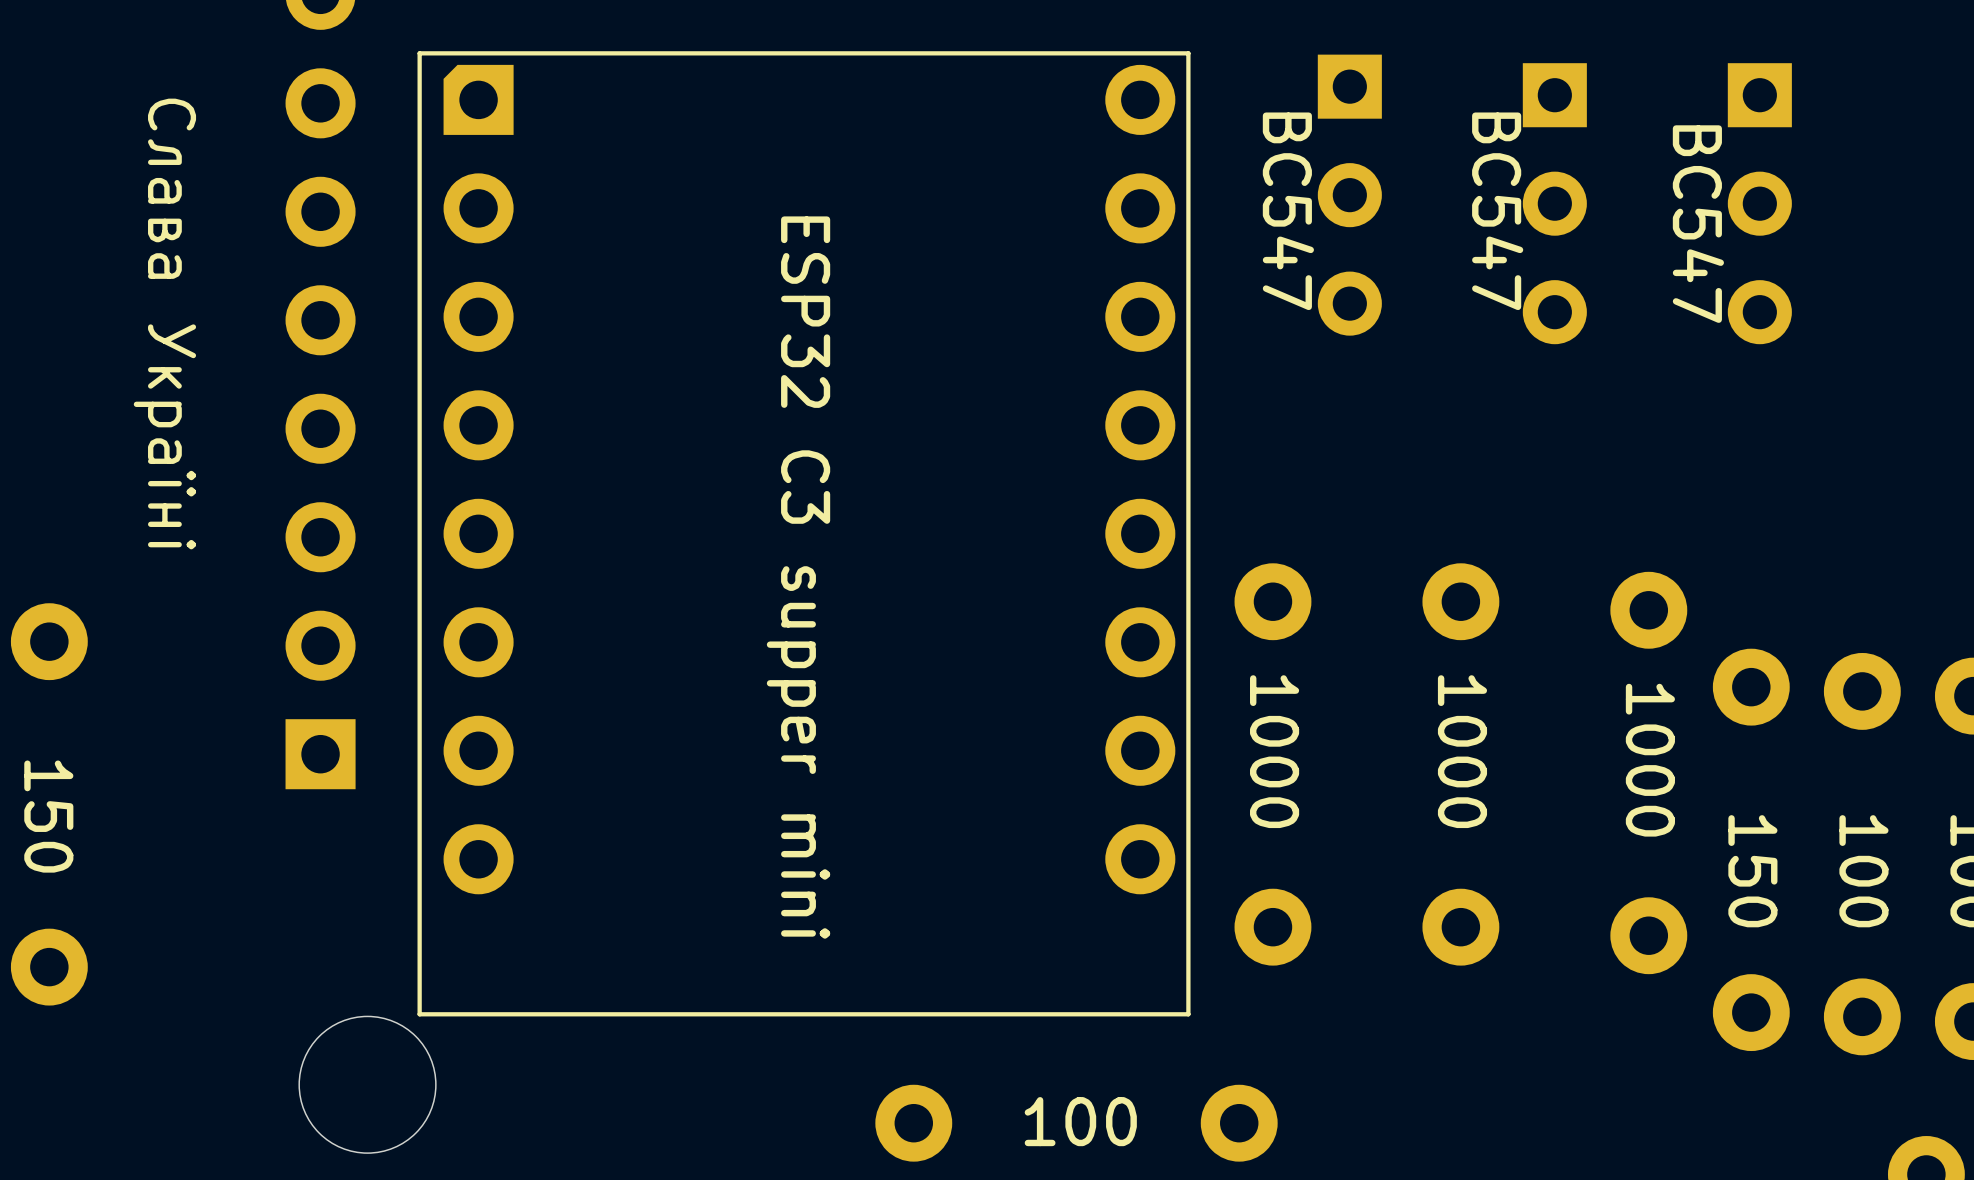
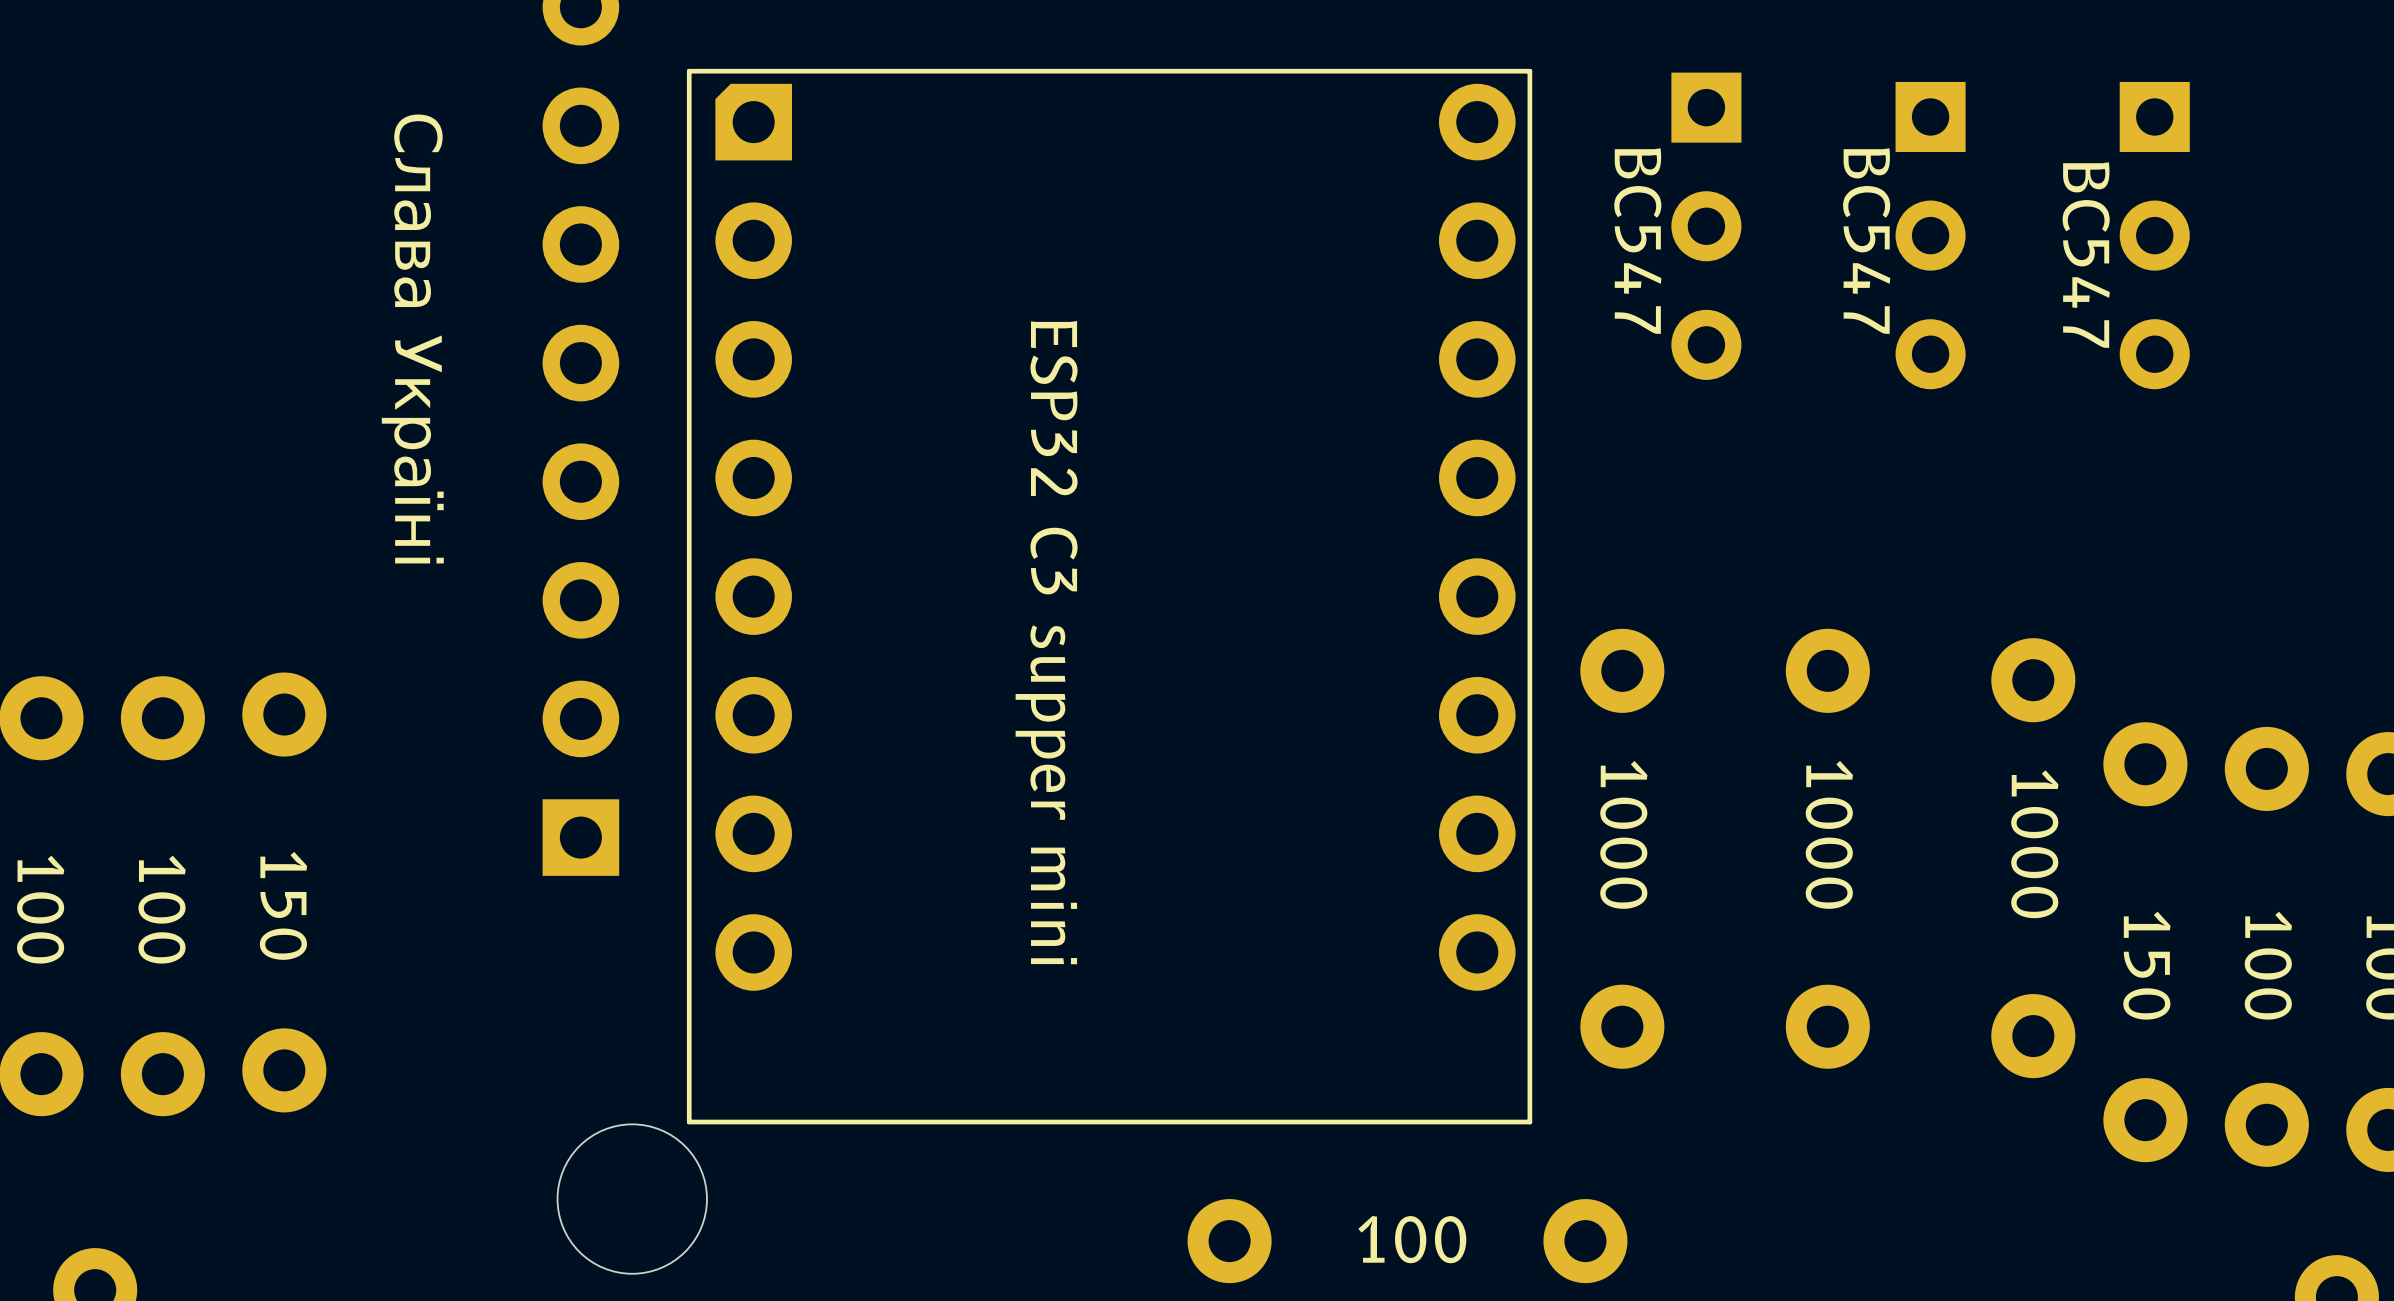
part value position: ESP32 C3 supper mini (798, 577) -> ESP32 C3 supper mini (1046, 642)

